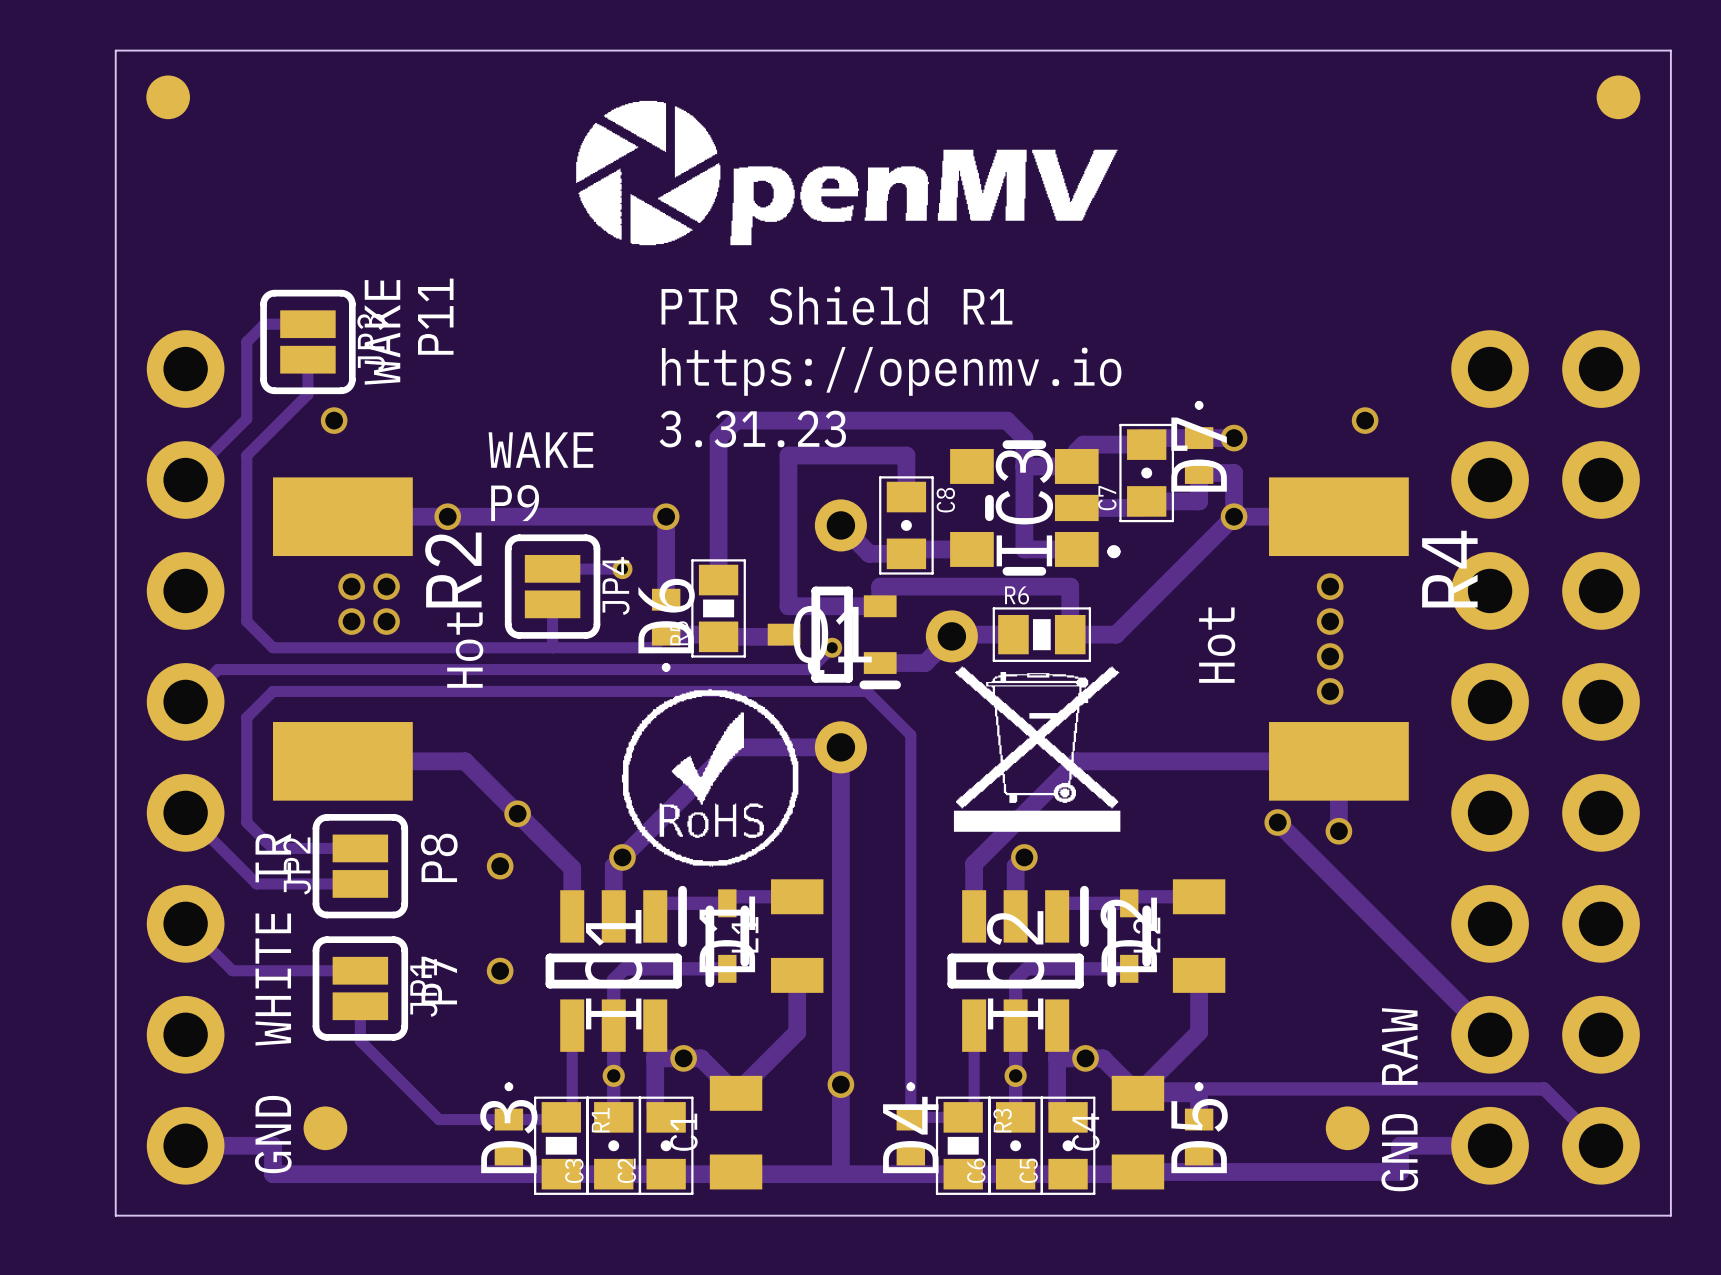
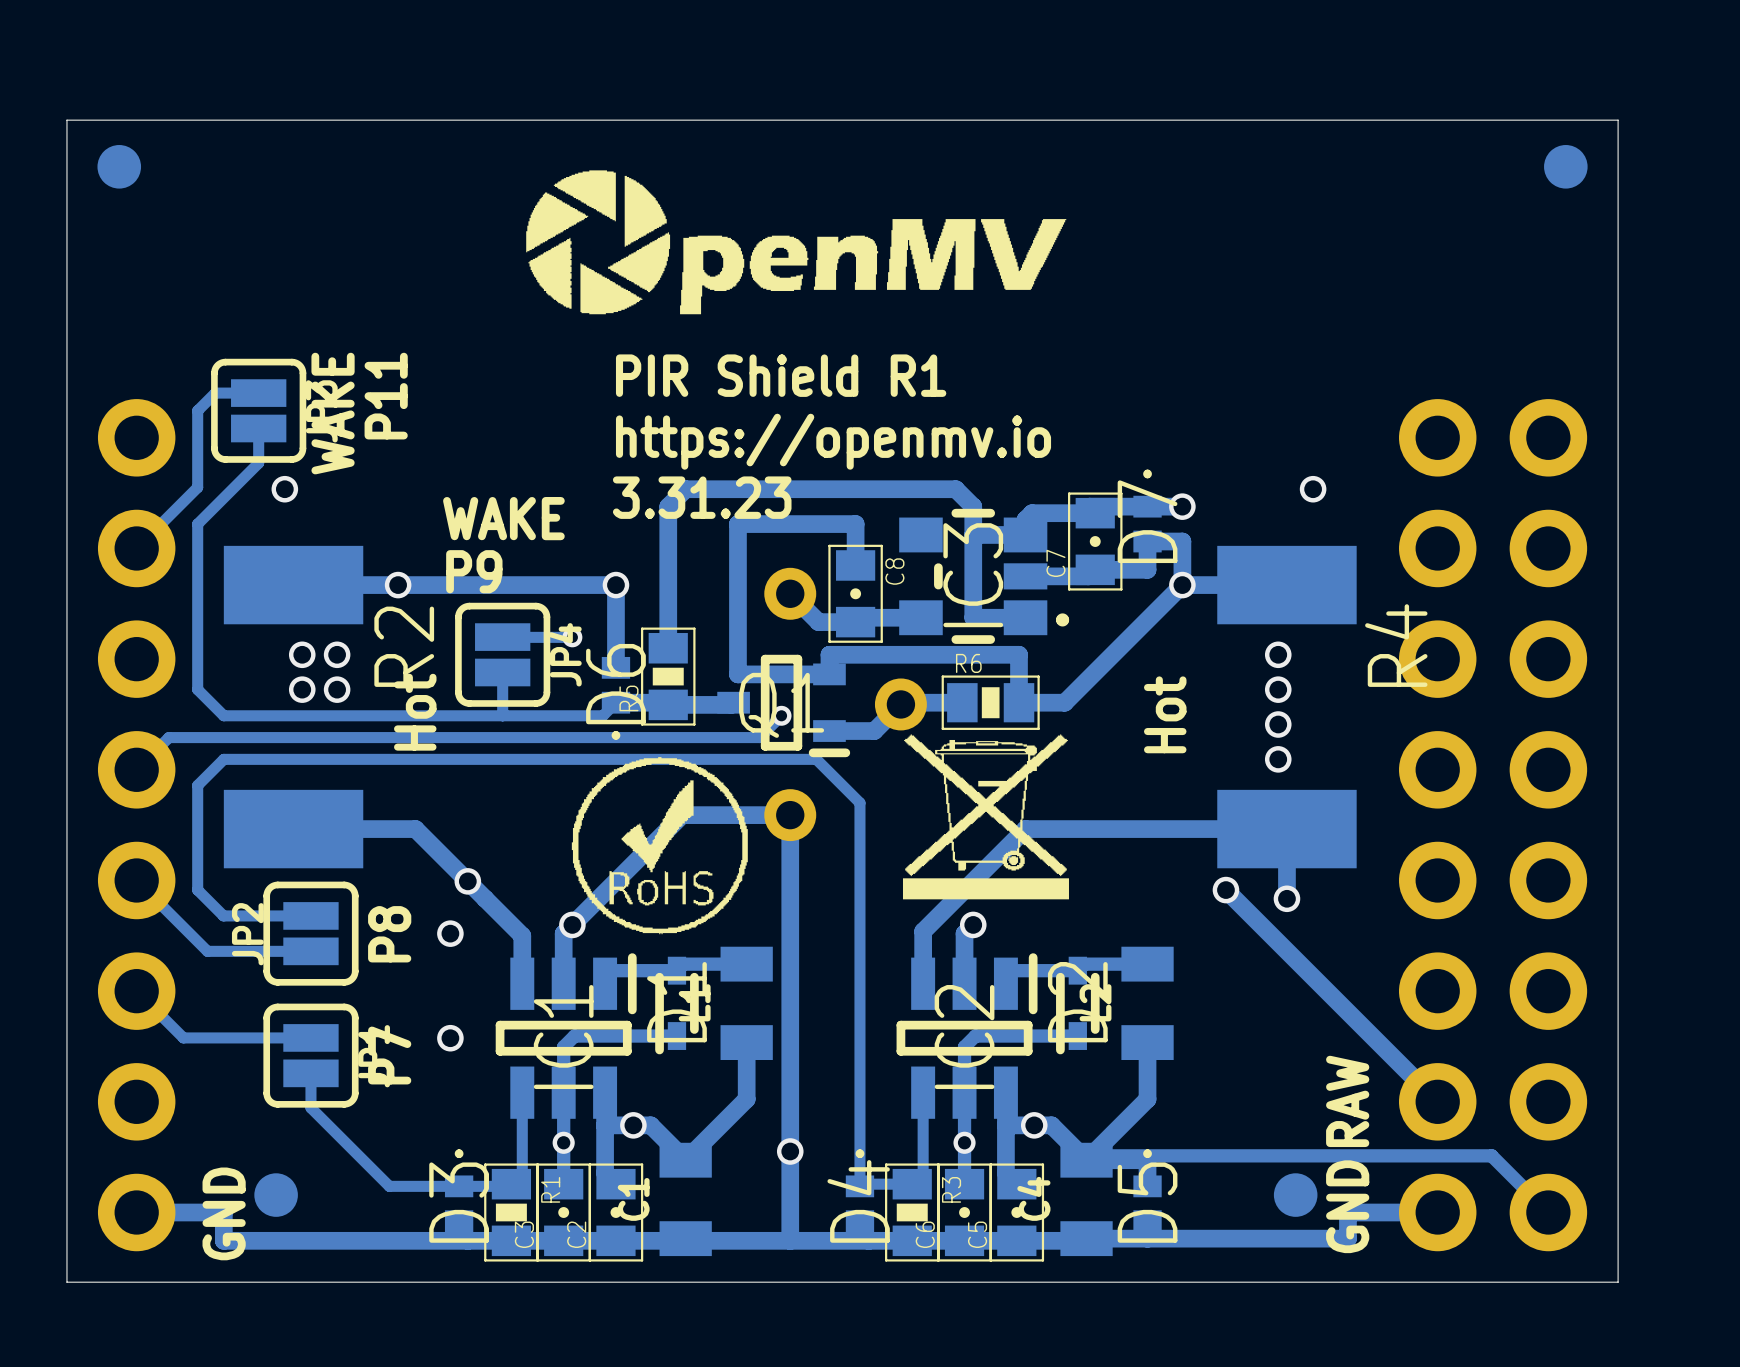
text: IR (273, 857) -> none
text: WHITE (273, 979) -> none

